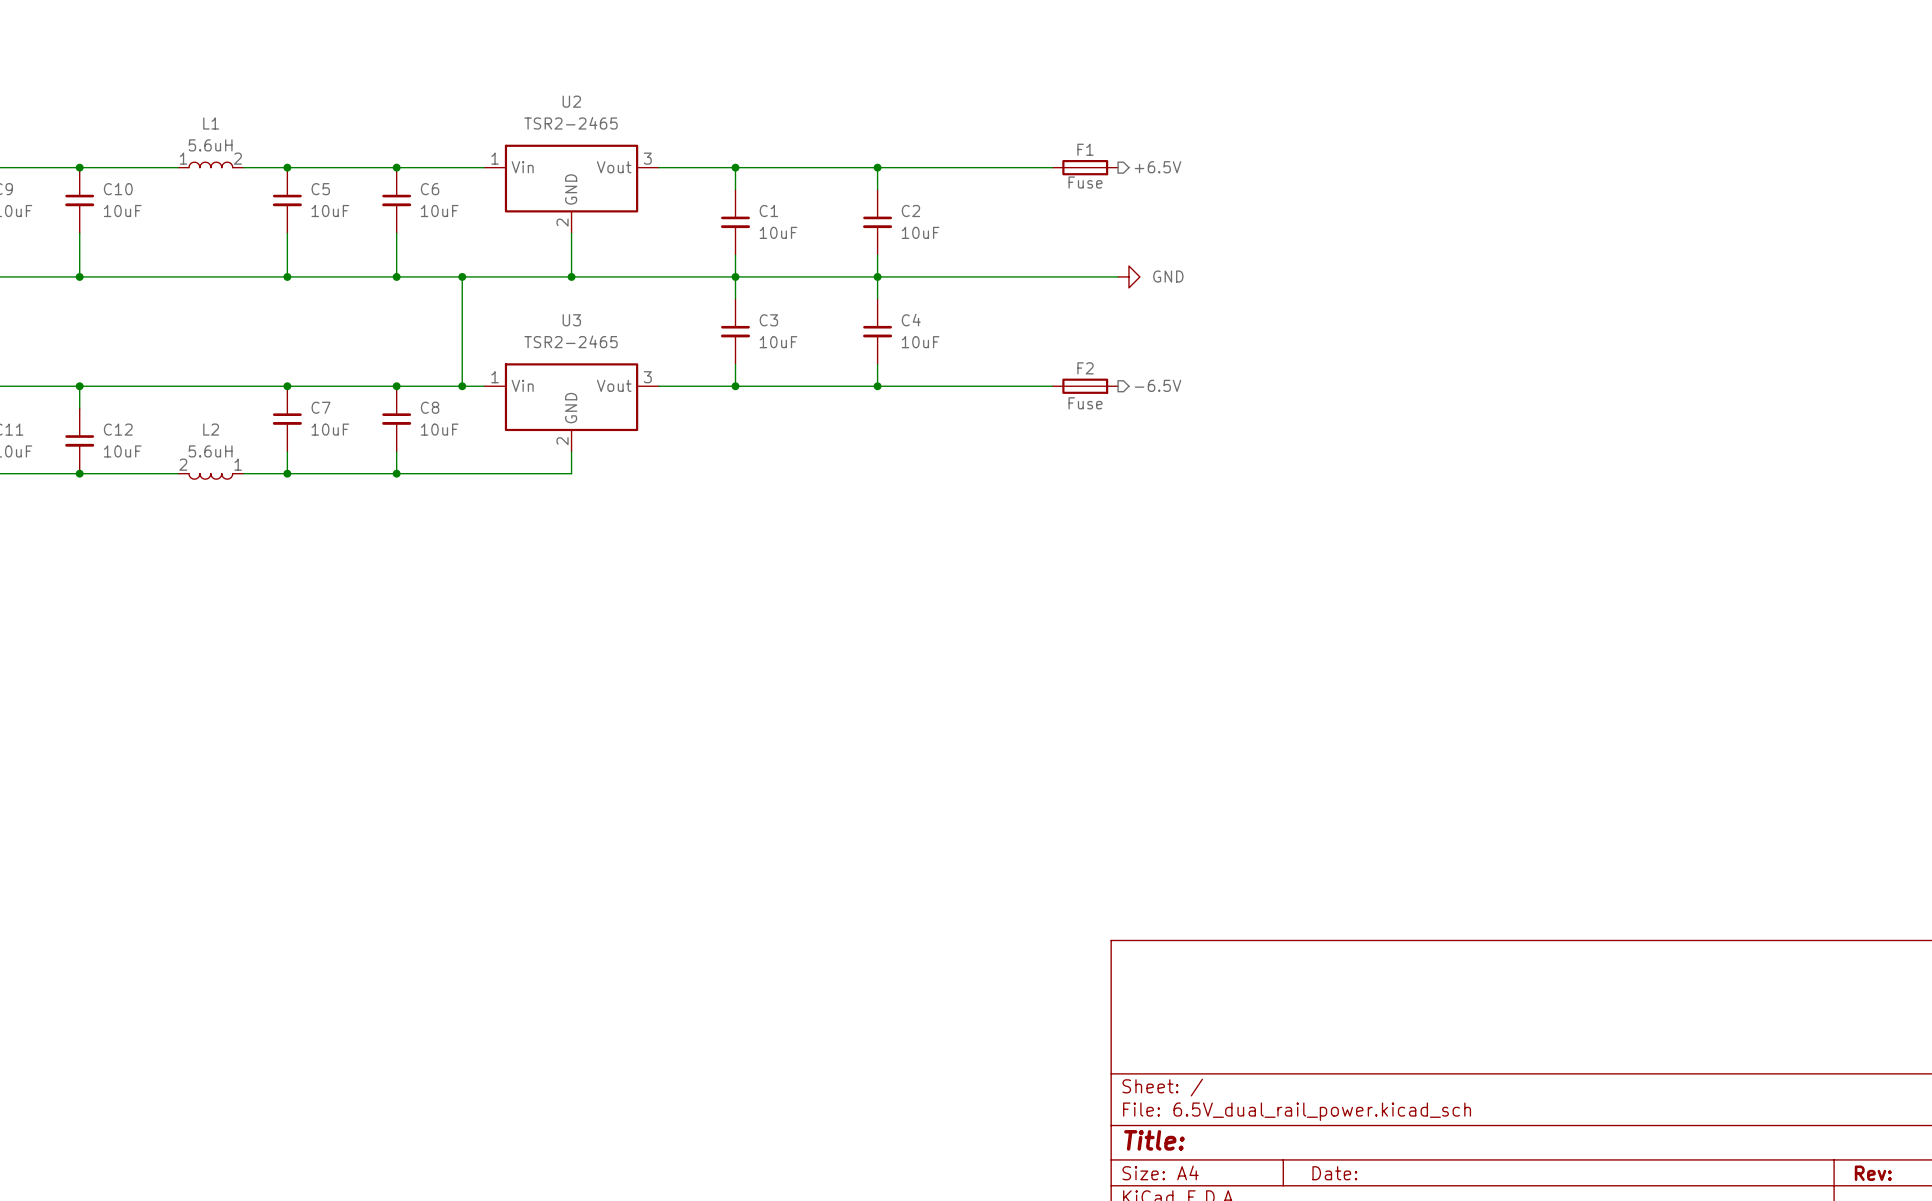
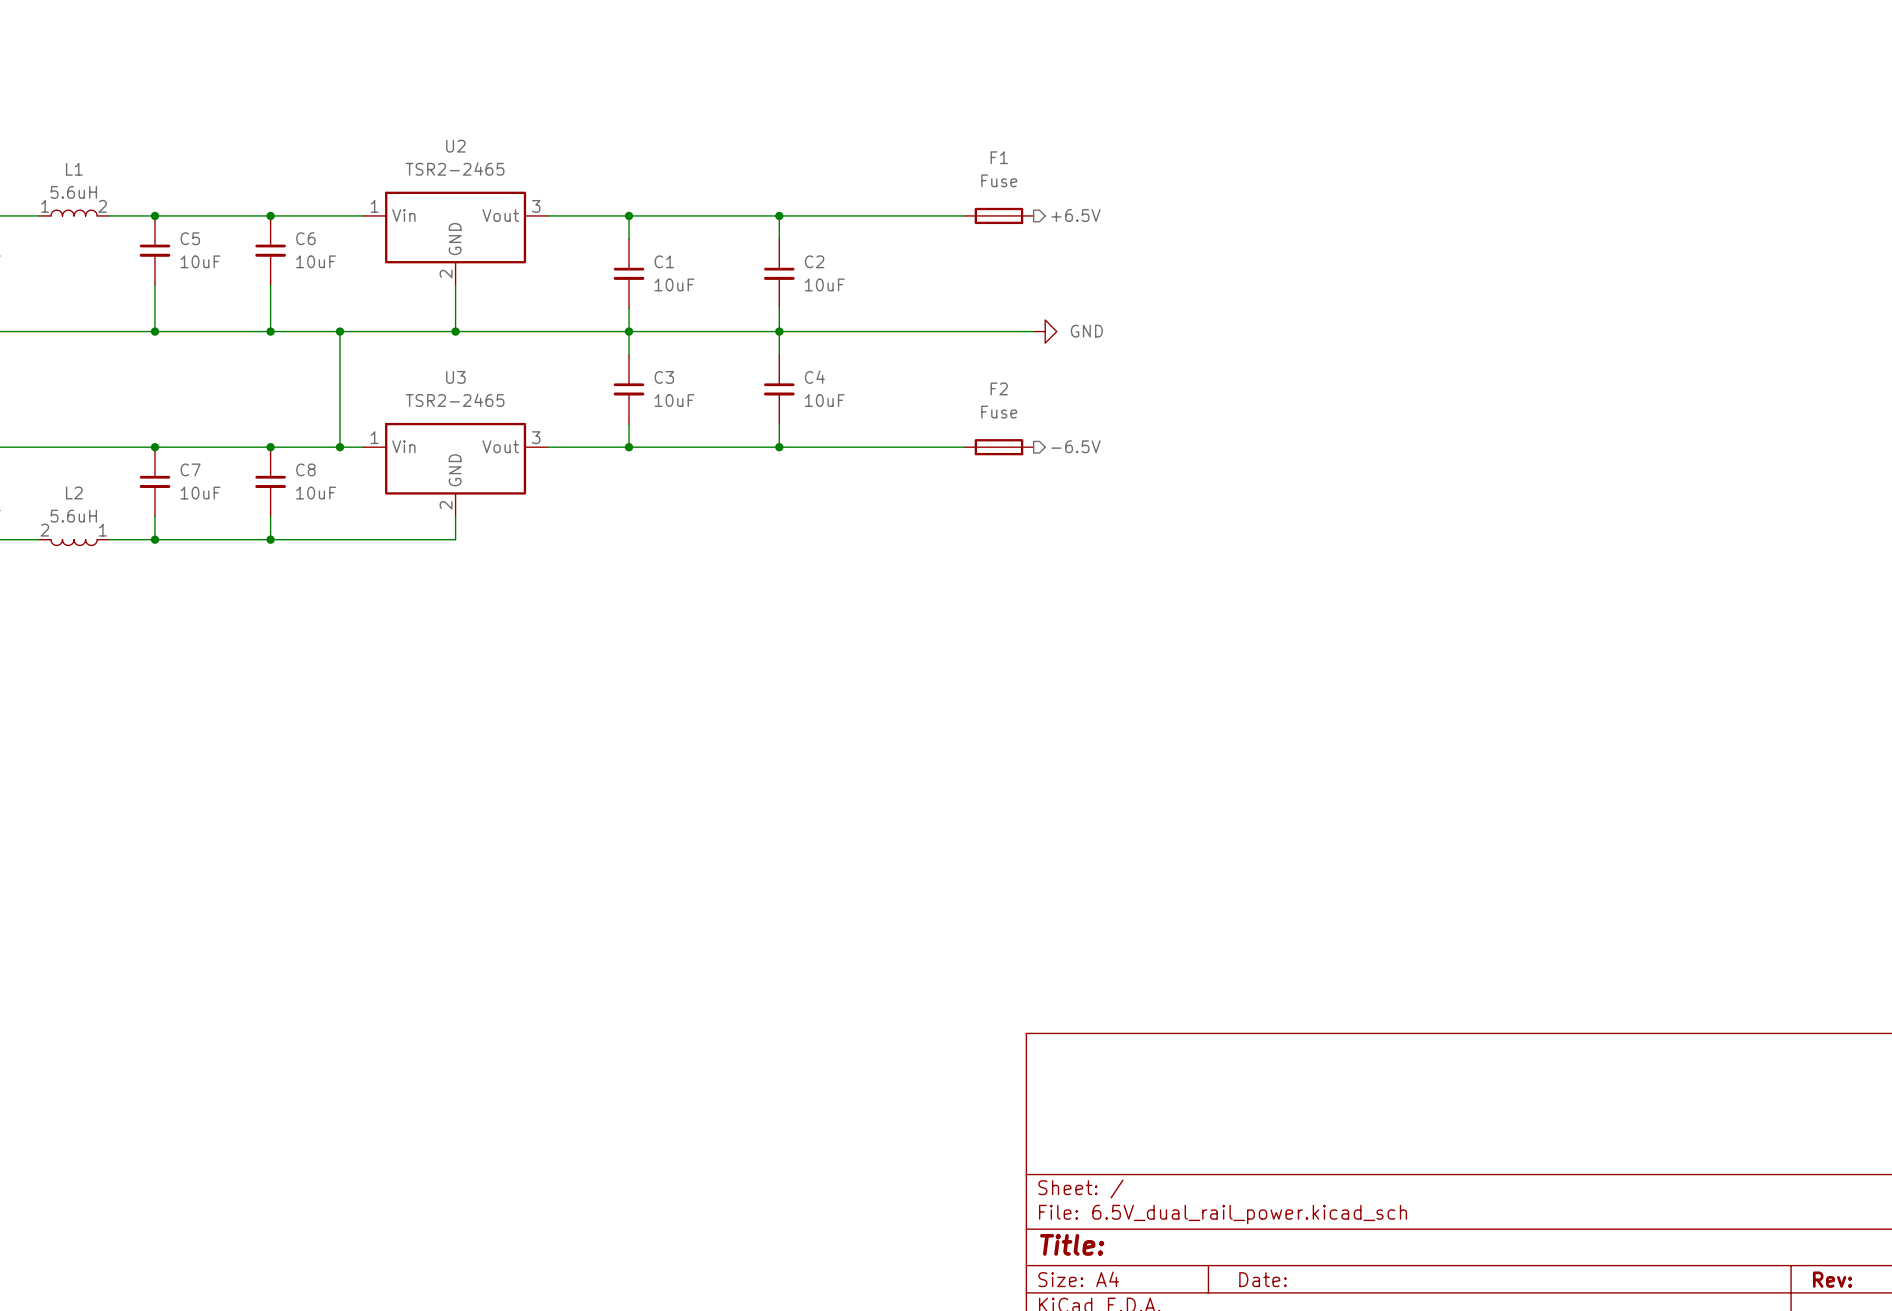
F1 name position: F1 (1085, 149) -> F1 (999, 157)
F1 value position: Fuse (1085, 182) -> Fuse (999, 180)
F2 name position: F2 (1085, 368) -> F2 (999, 388)
F2 value position: Fuse (1085, 403) -> Fuse (999, 412)

